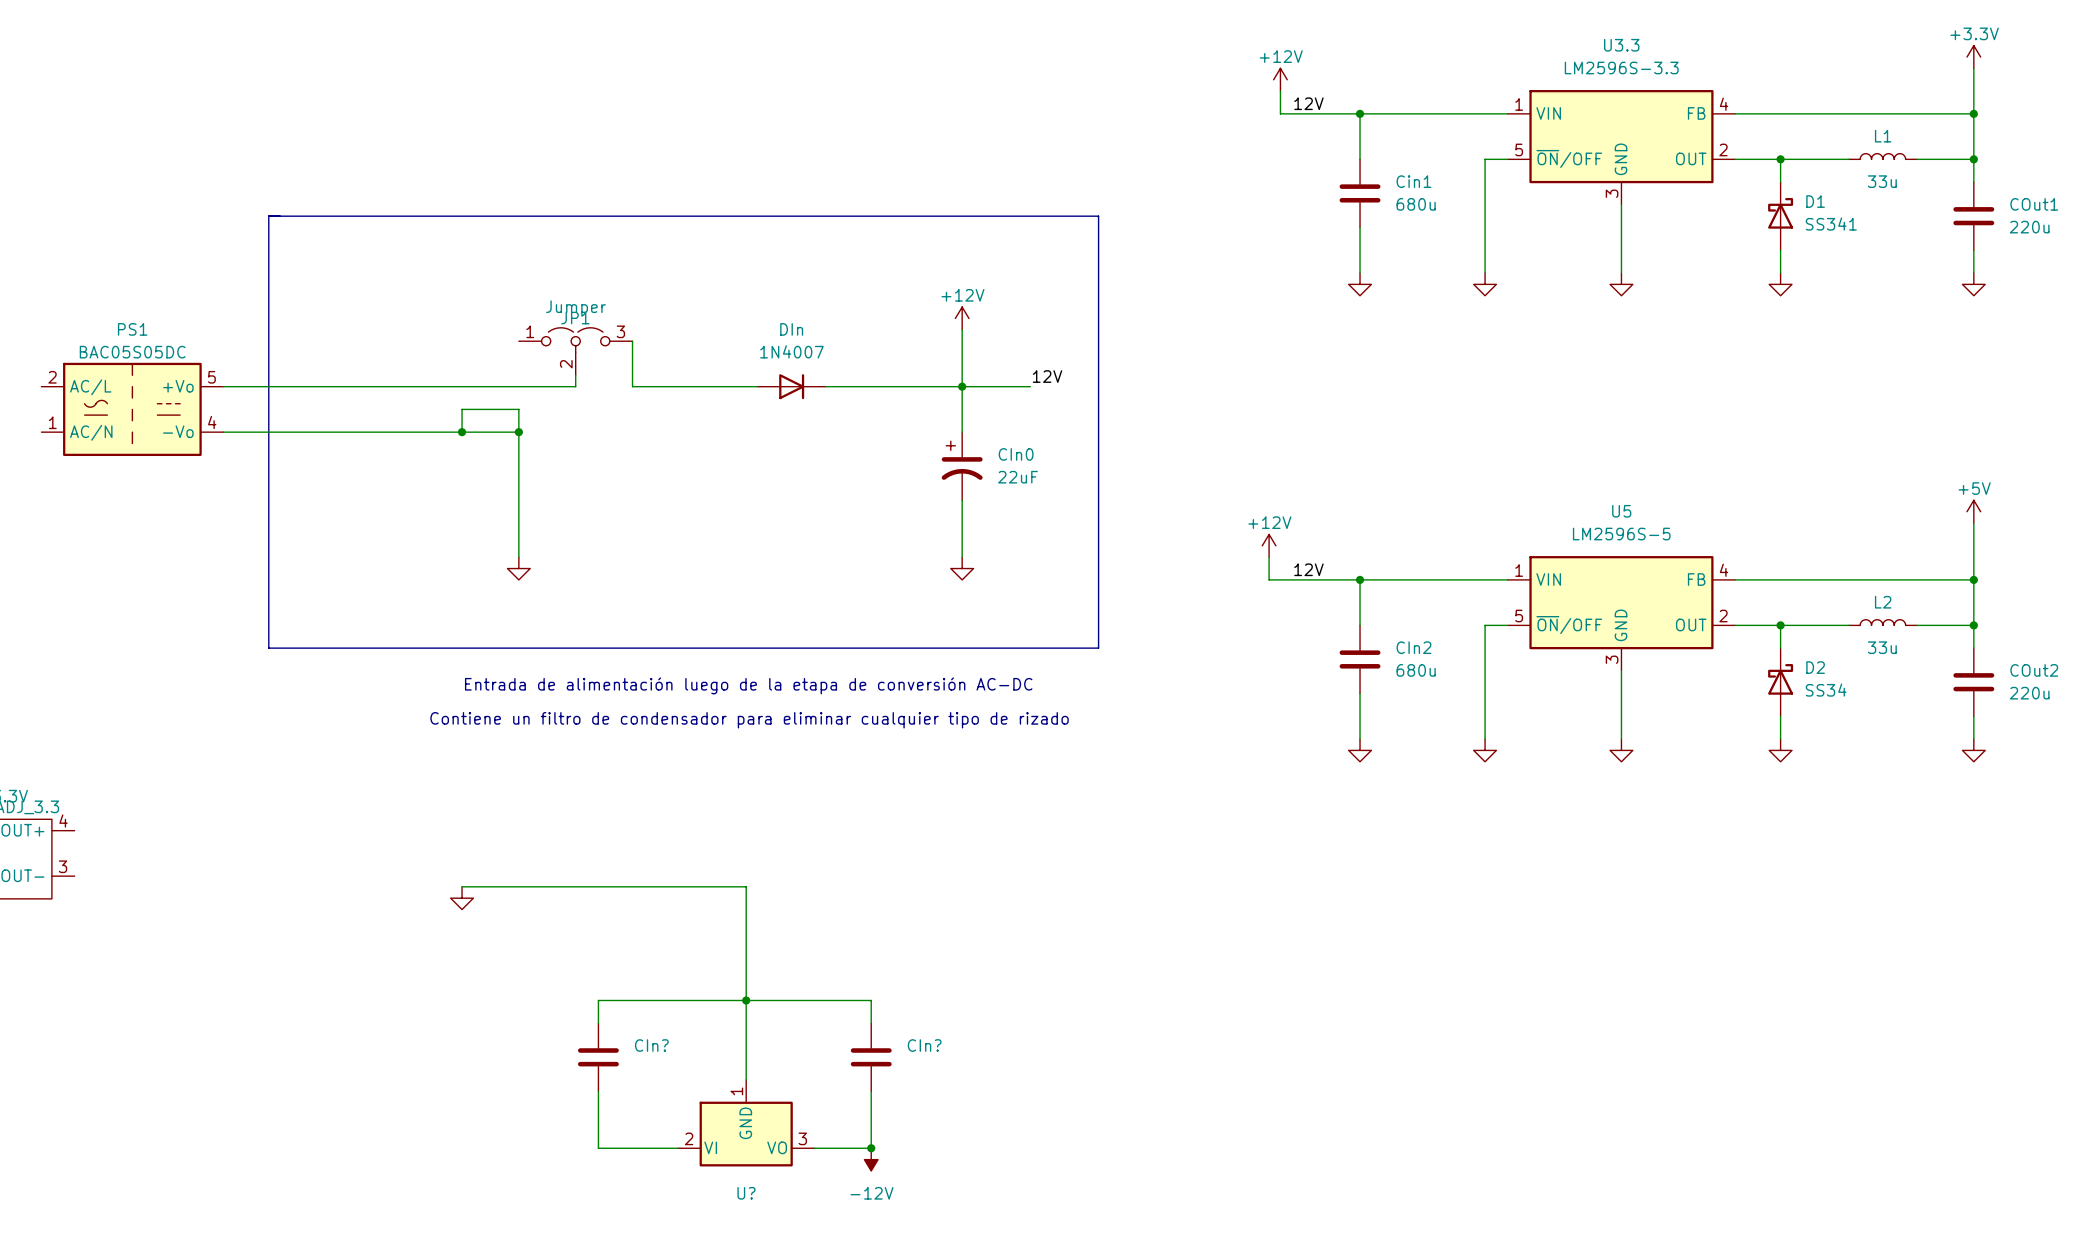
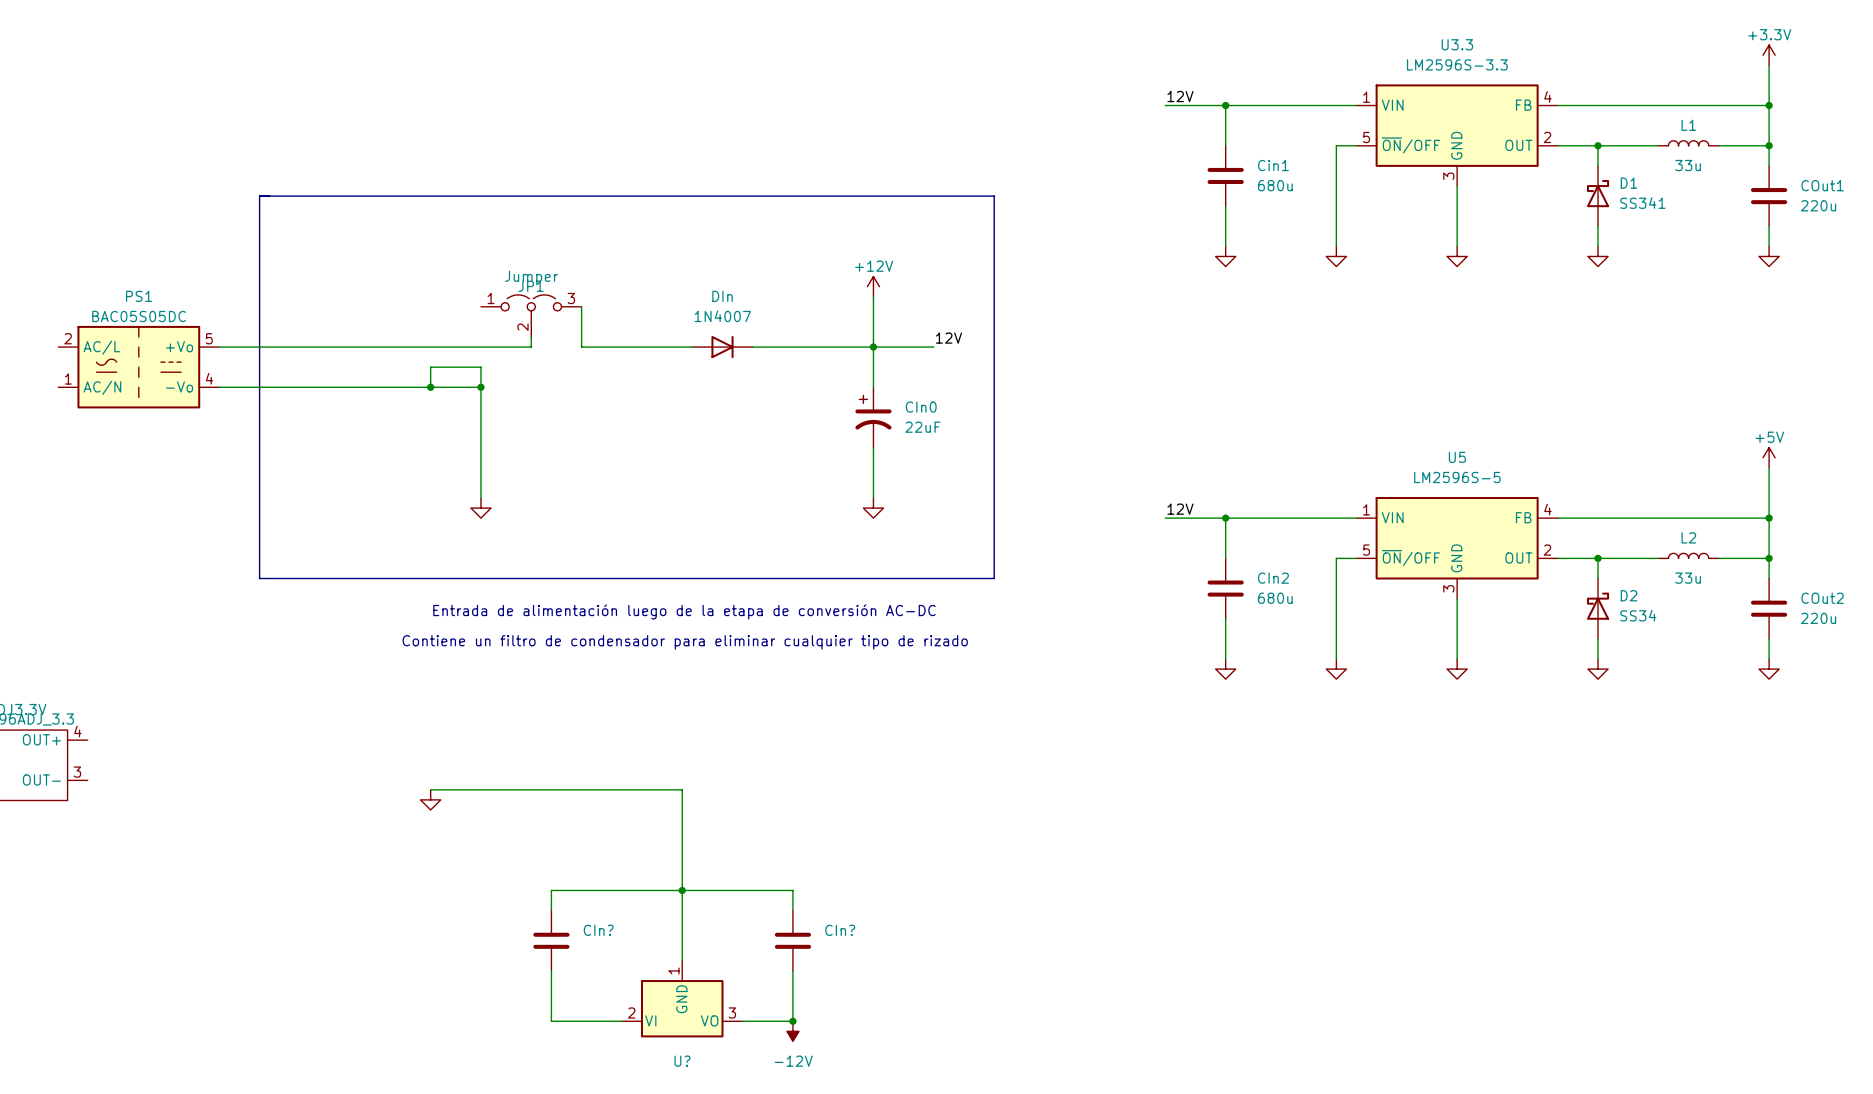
power symbol: +12V (1280, 79) -> none
wire: (1280, 91) (1280, 113) (1291, 113) -> none
power symbol: +12V (1269, 545) -> none
wire: (1269, 557) (1269, 579) (1291, 579) -> none

